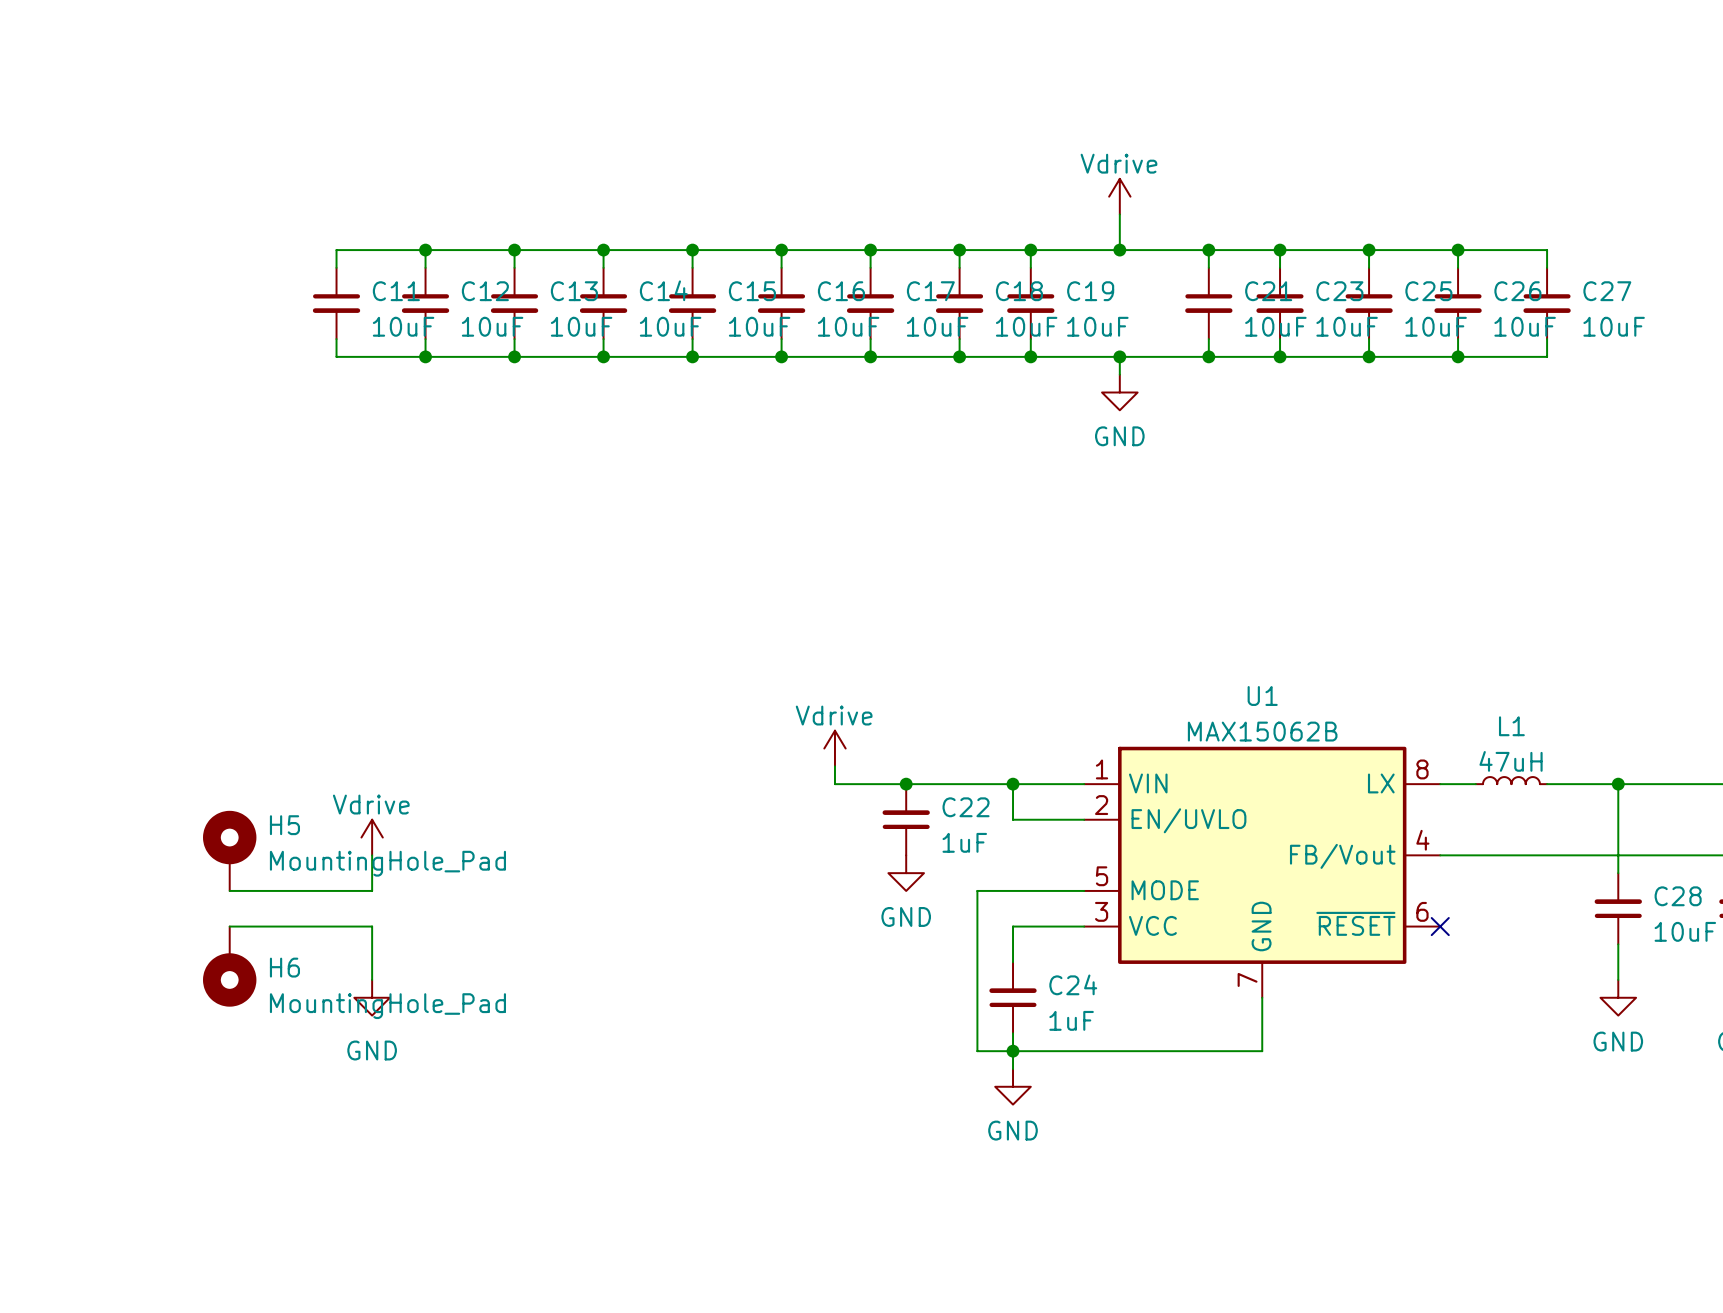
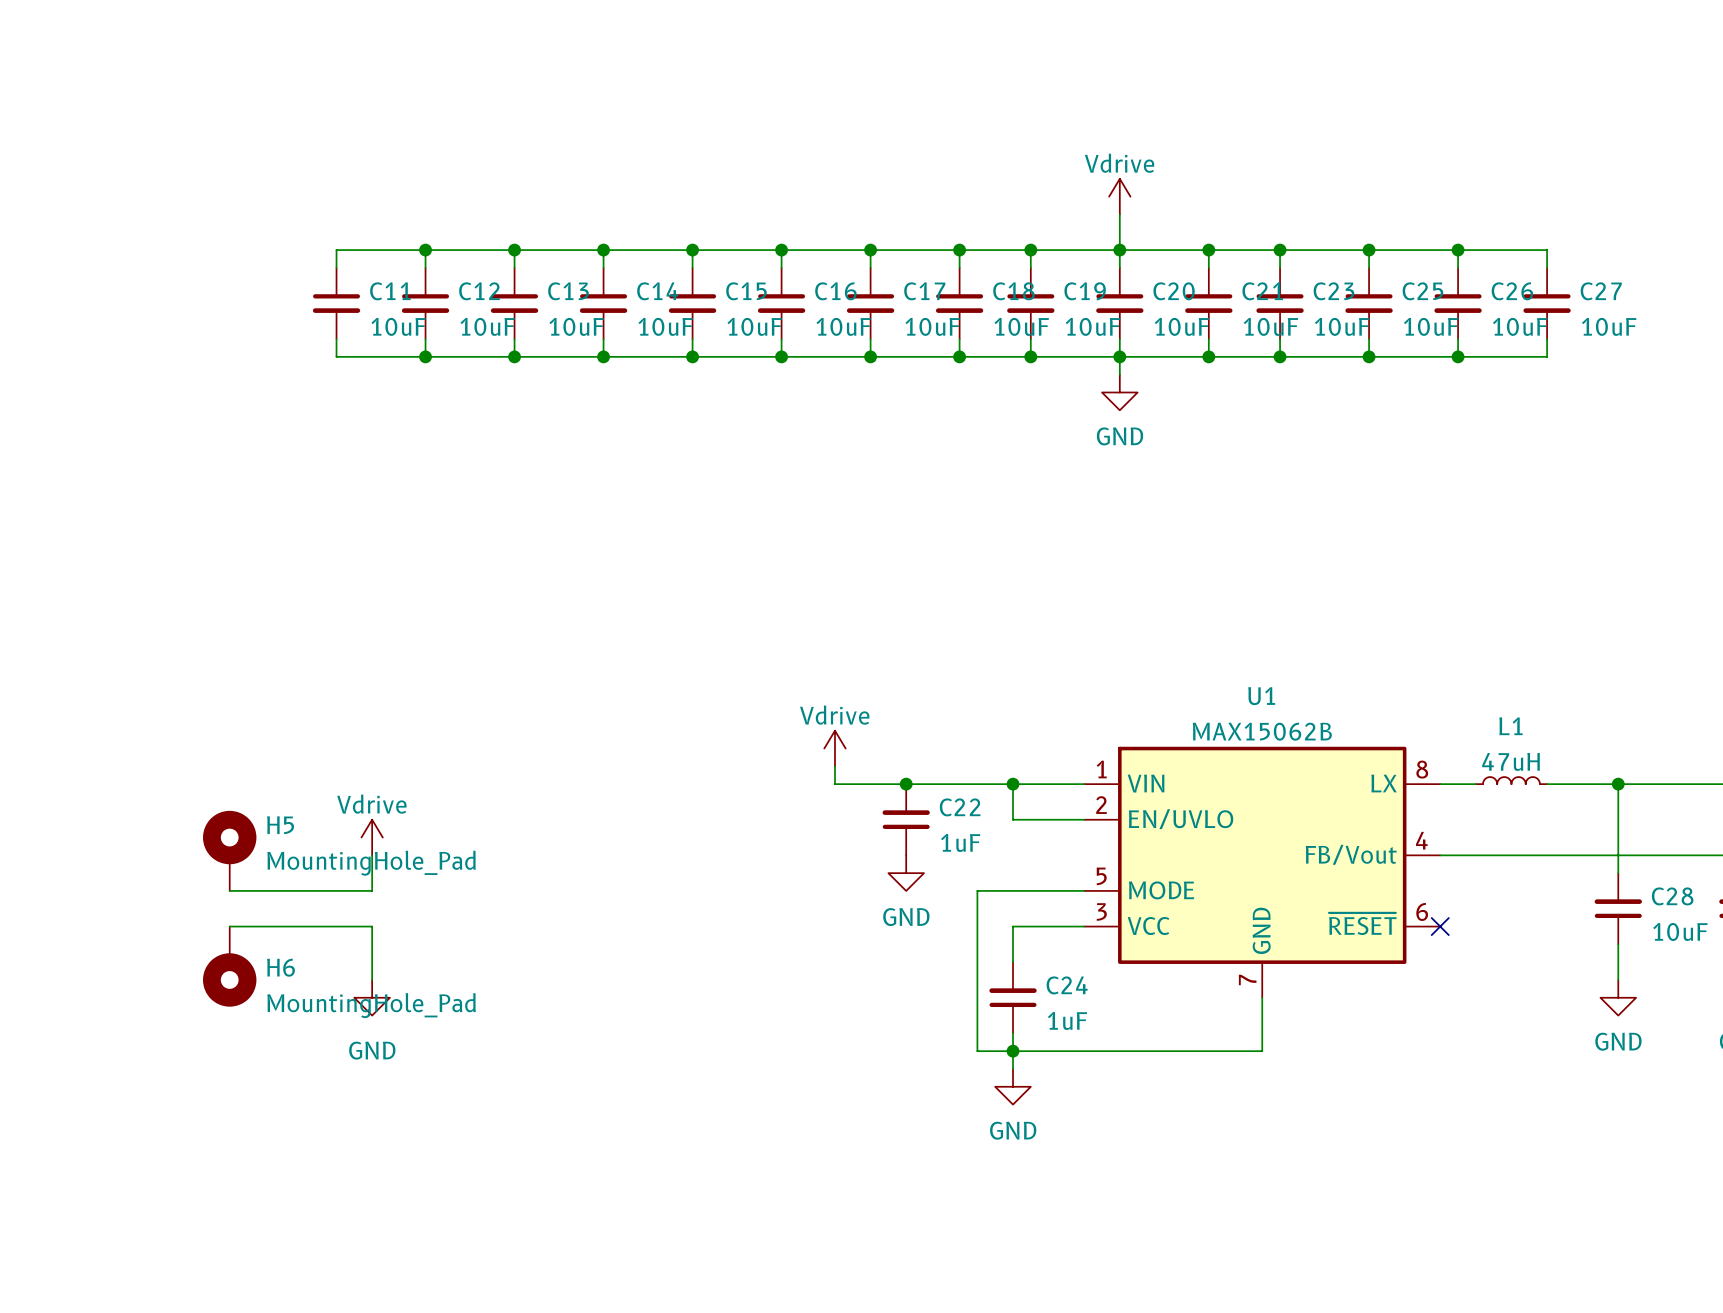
wire: none -> (1119, 250) (1119, 267)
C20: none -> 10uF (1119, 303)
wire: none -> (1119, 339) (1119, 356)

